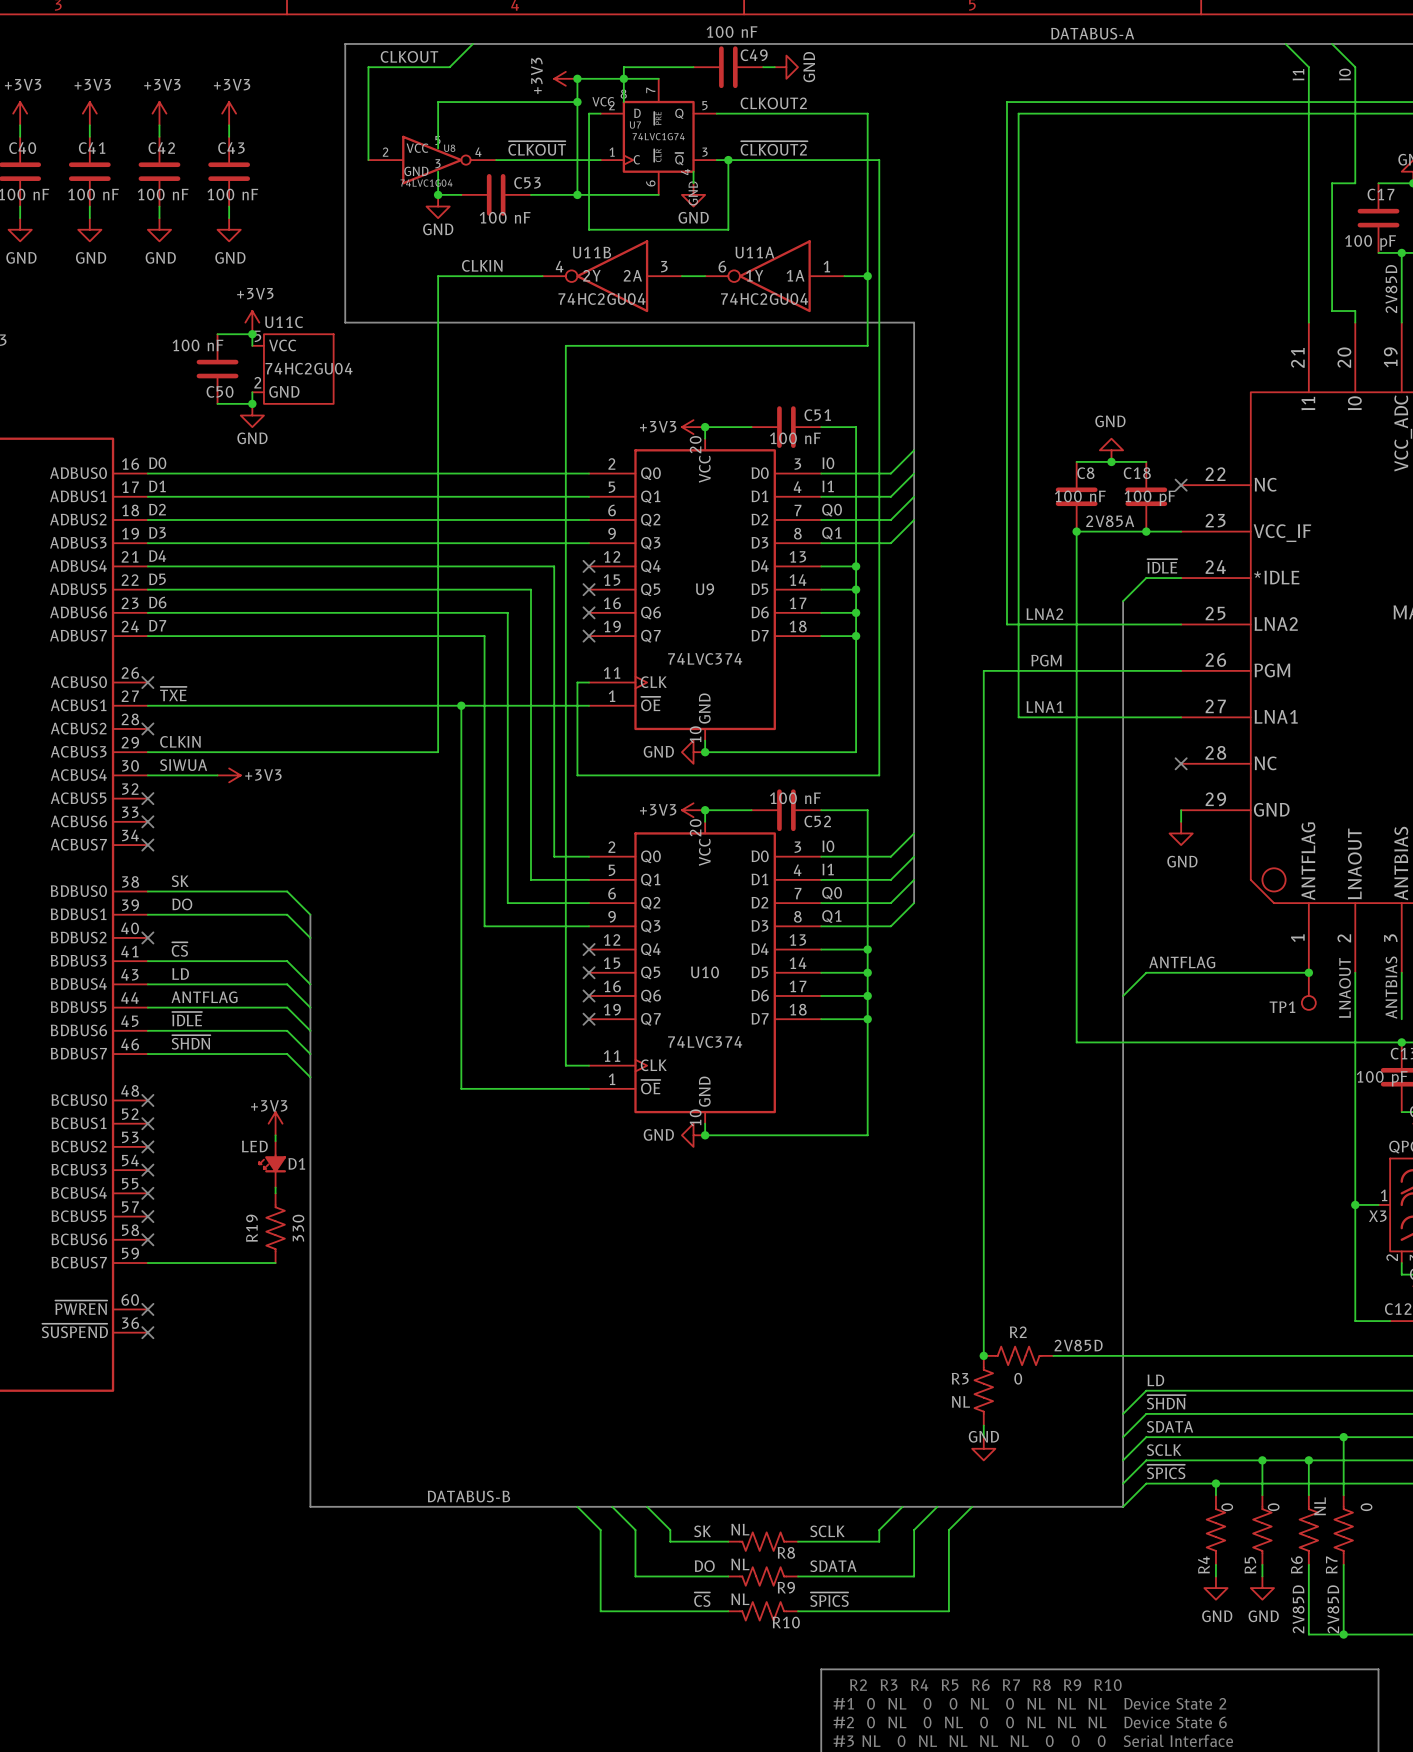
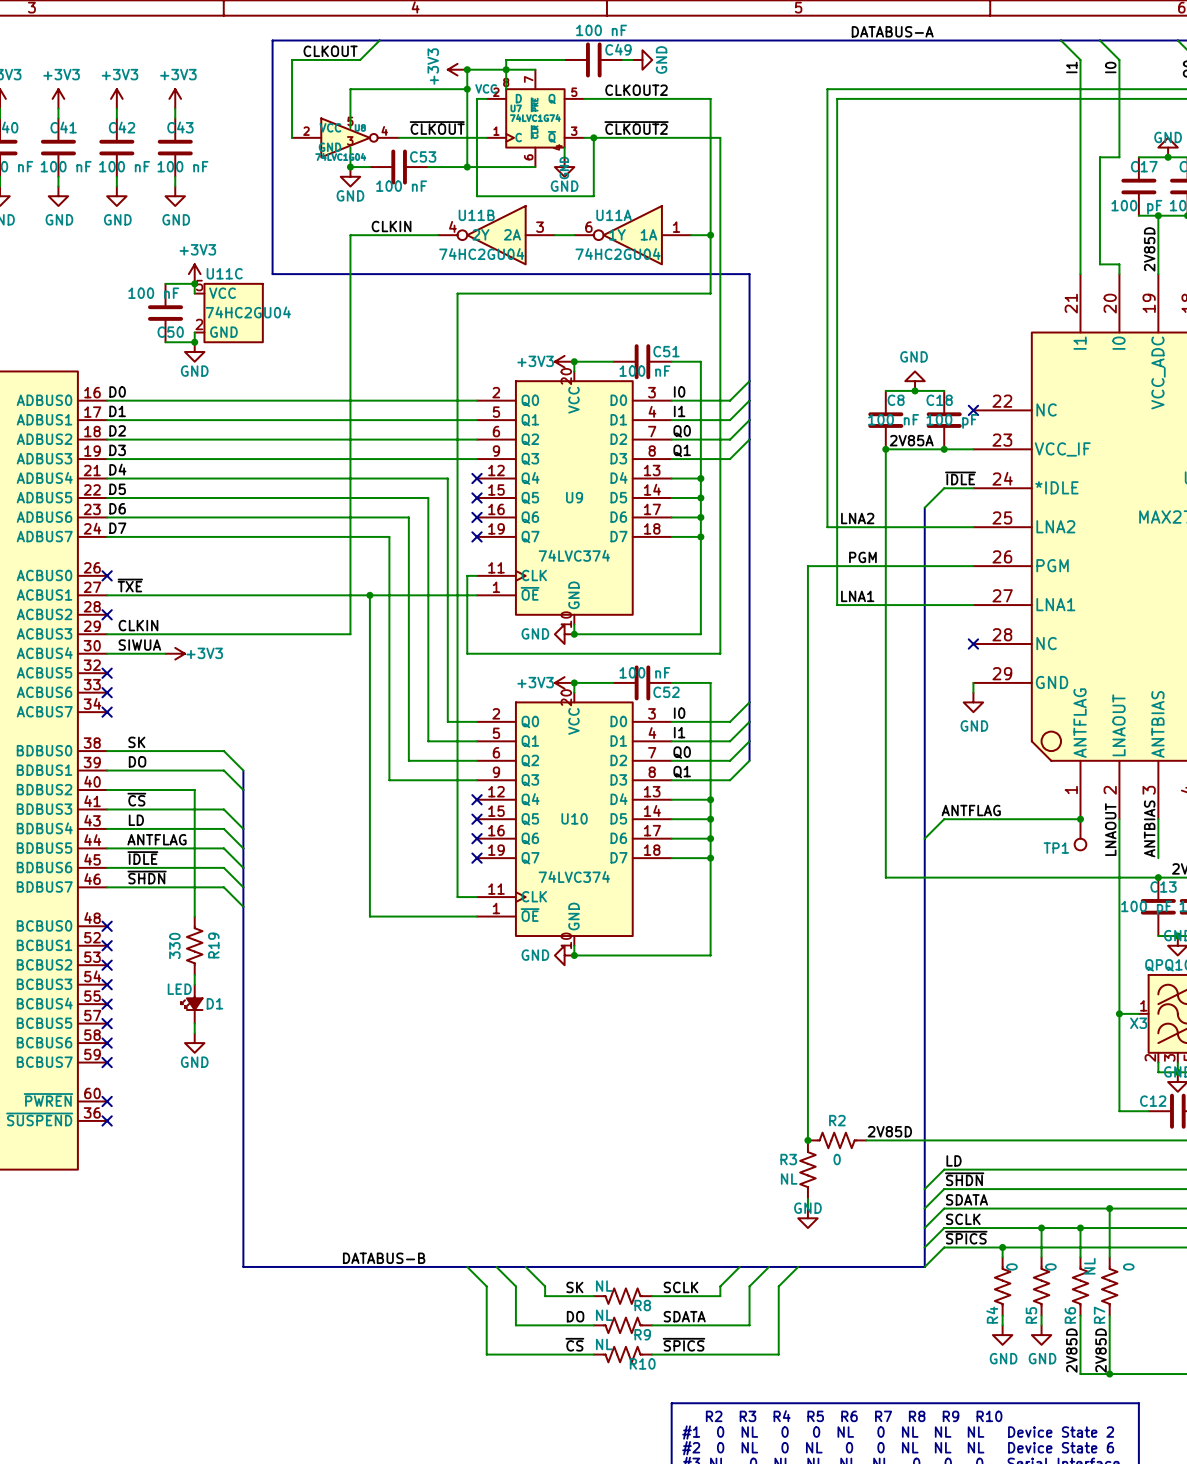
wire: none -> (107, 790) (194, 790) (194, 916)
no-connect mark: (147, 937) -> none
power symbol: +3V3 (275, 1123) -> none
wire: (275, 1135) (275, 1141) -> none
wire: none -> (194, 974) (194, 984)
D1 position: (272, 1164) -> (192, 1004)
wire: (275, 1187) (275, 1193) -> none
wire: none -> (194, 1023) (194, 1033)
R19 name position: R19 (251, 1228) -> R19 (213, 945)
R19 position: (275, 1228) -> (194, 945)
R19 value position: 330 (298, 1228) -> 330 (174, 945)
power symbol: none -> GND (194, 1043)
wire: (147, 1263) (275, 1263) -> none
no-connect mark: none -> (107, 1062)

